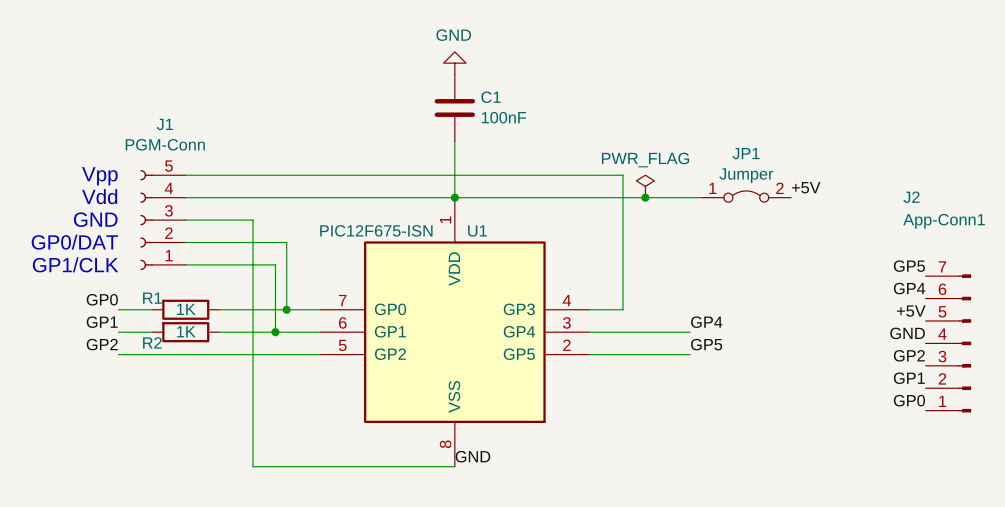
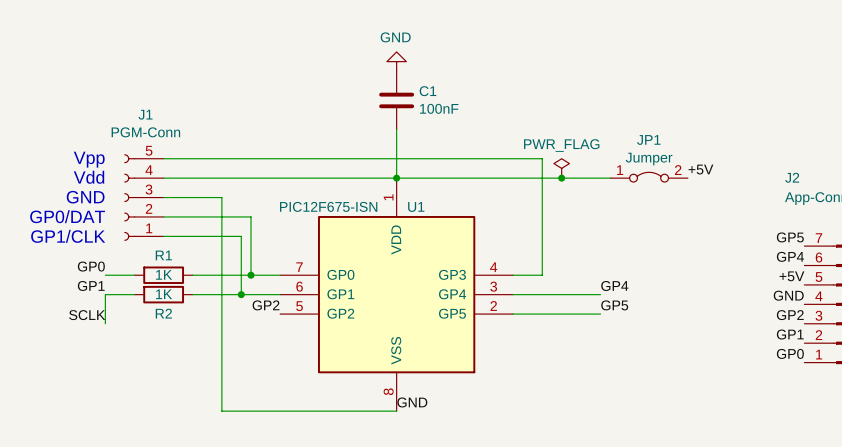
R1 name position: R1 (152, 298) -> R1 (163, 255)
wire: none -> (105, 294) (105, 323)
R2 name position: R2 (152, 342) -> R2 (163, 313)
label position: GP2 (102, 344) -> GP2 (266, 305)
wire: (118, 354) (320, 354) -> none
label: none -> SCLK (87, 315)

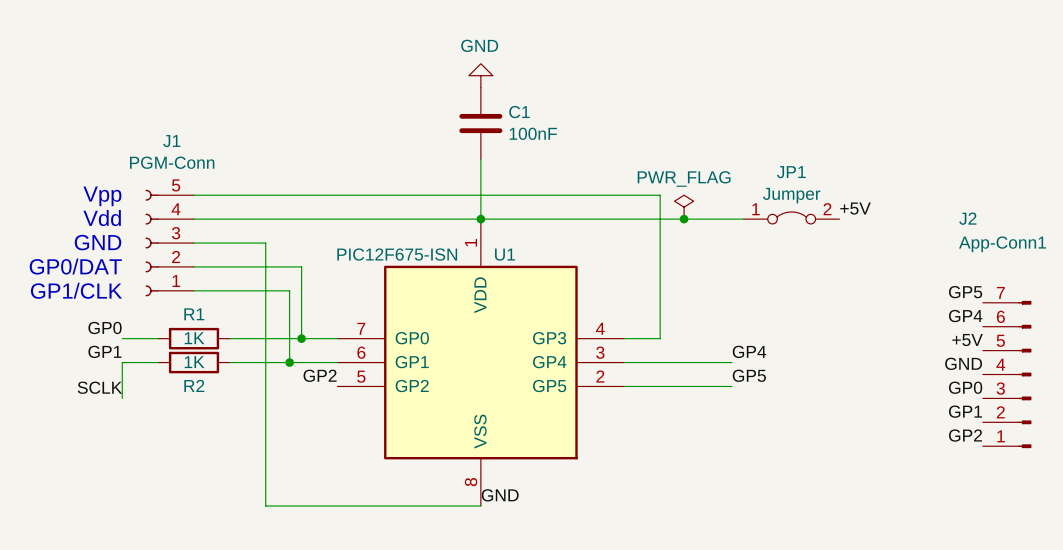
label: GP2 (790, 315) -> GP0 (965, 387)
label: GP0 (790, 353) -> GP2 (965, 435)

